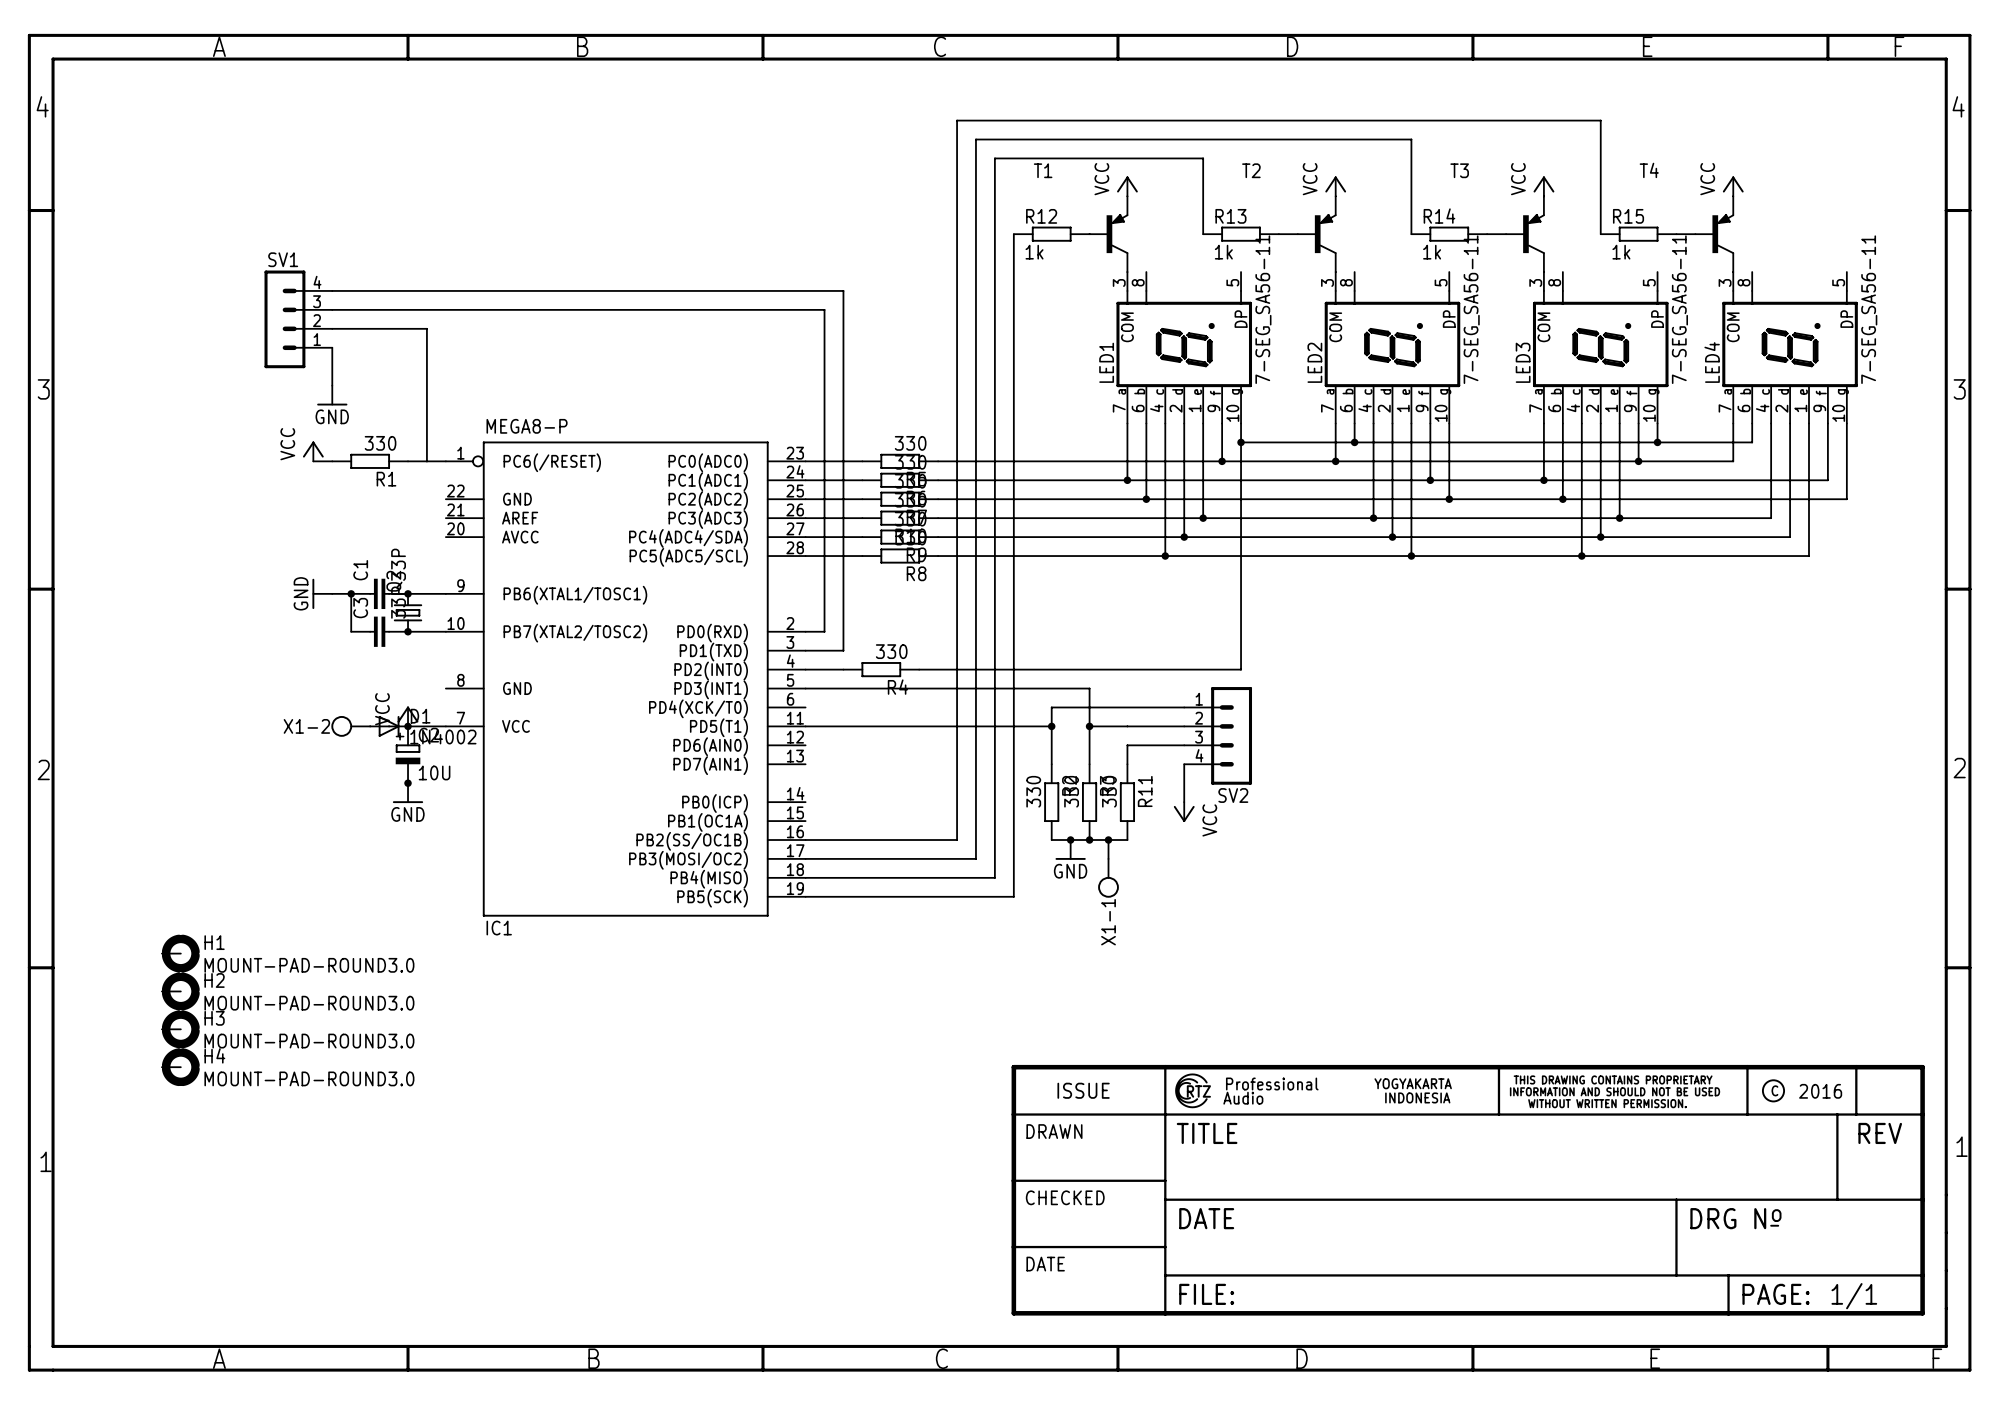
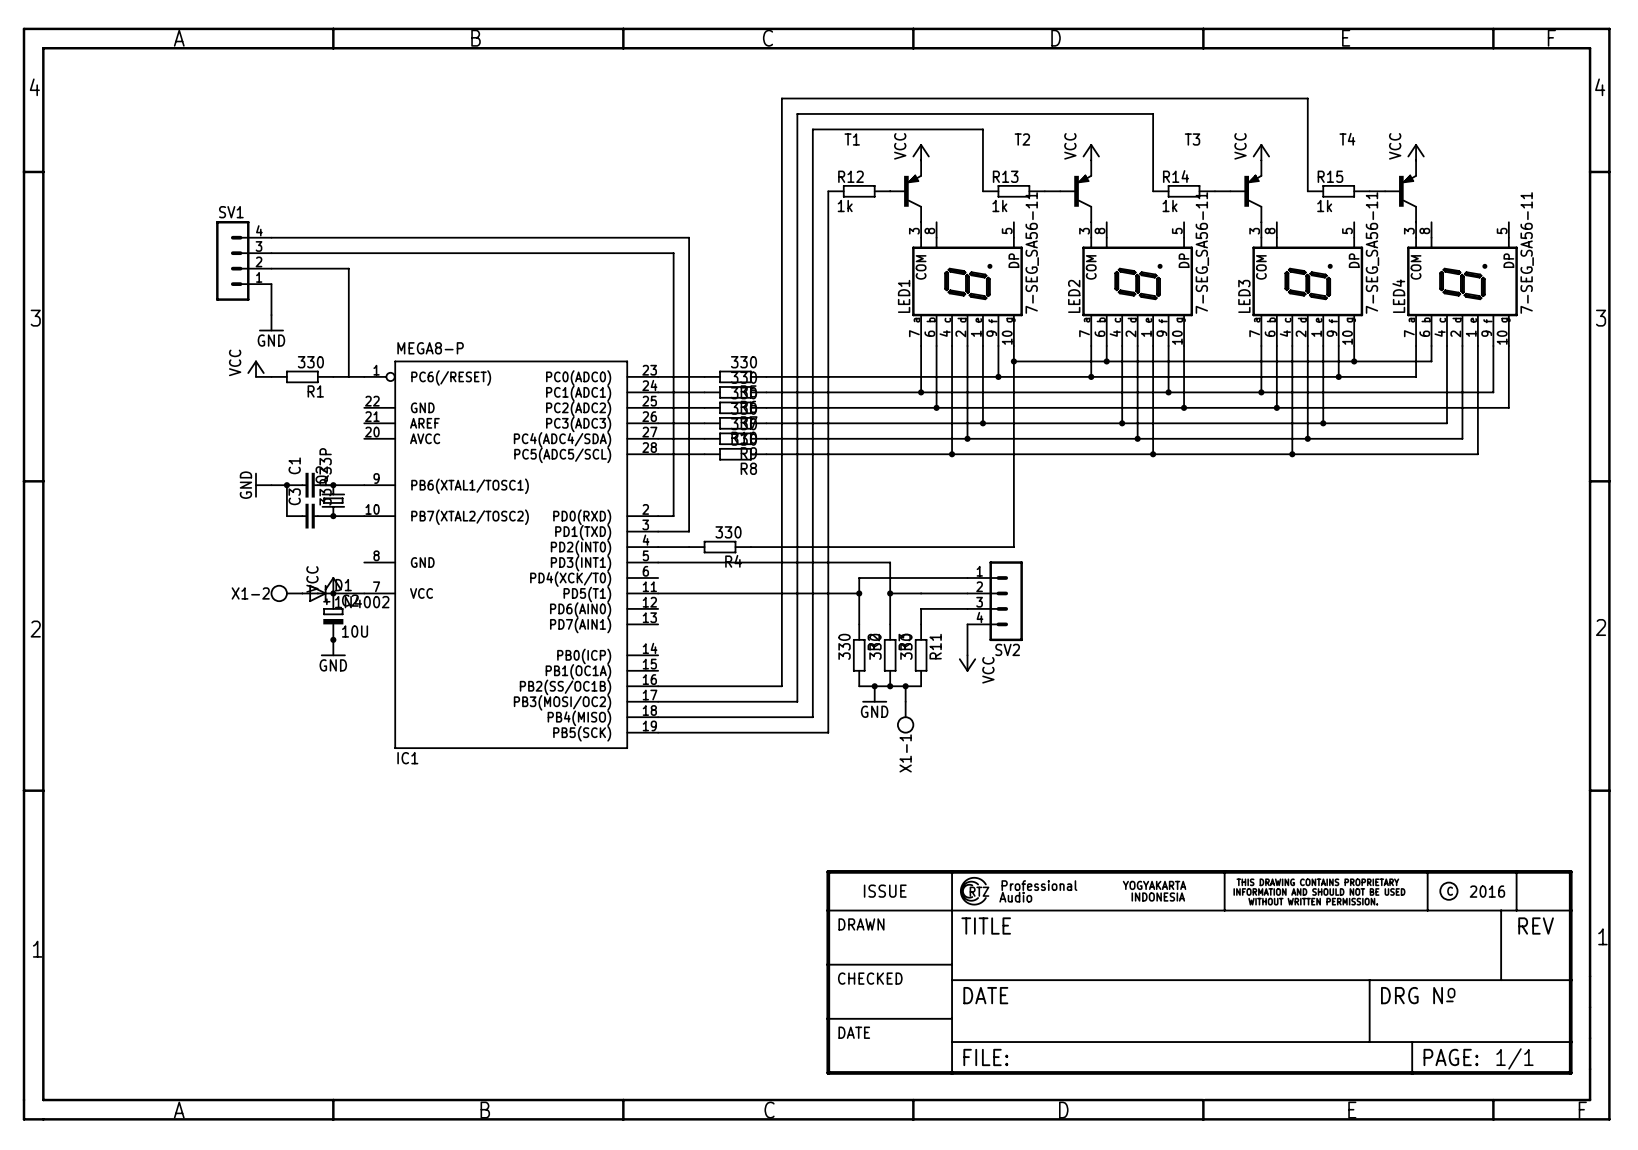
H1: MOUNT-PAD-ROUND3.0 (180, 953) -> none
H2: MOUNT-PAD-ROUND3.0 (180, 991) -> none
H3: MOUNT-PAD-ROUND3.0 (180, 1029) -> none
H4: MOUNT-PAD-ROUND3.0 (180, 1067) -> none

